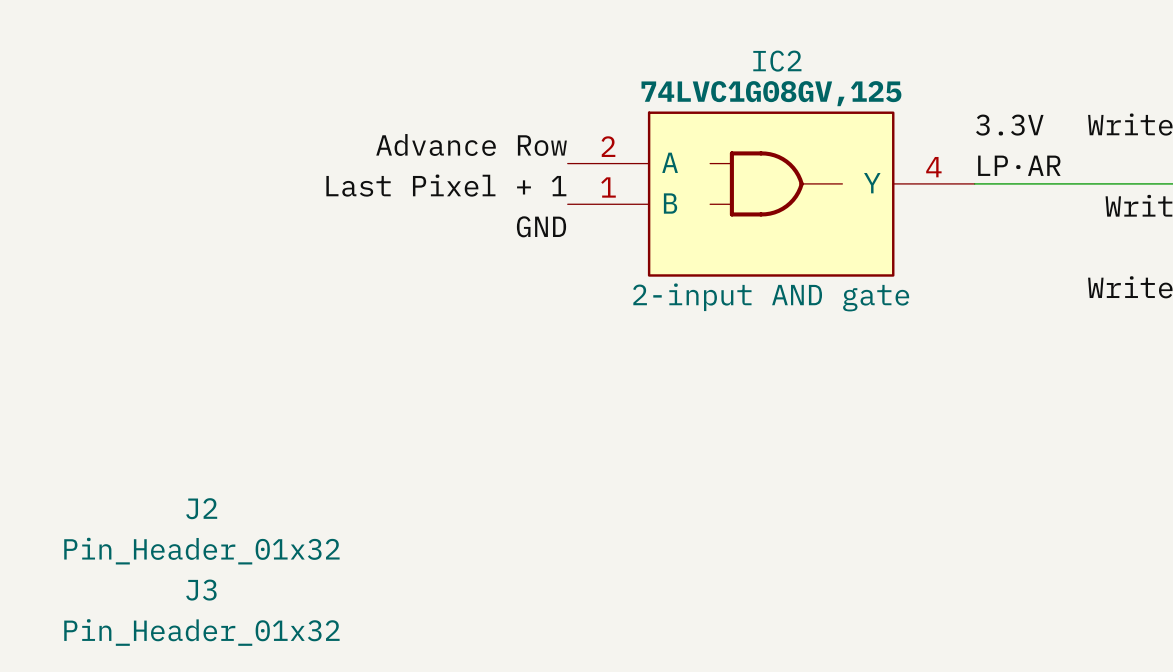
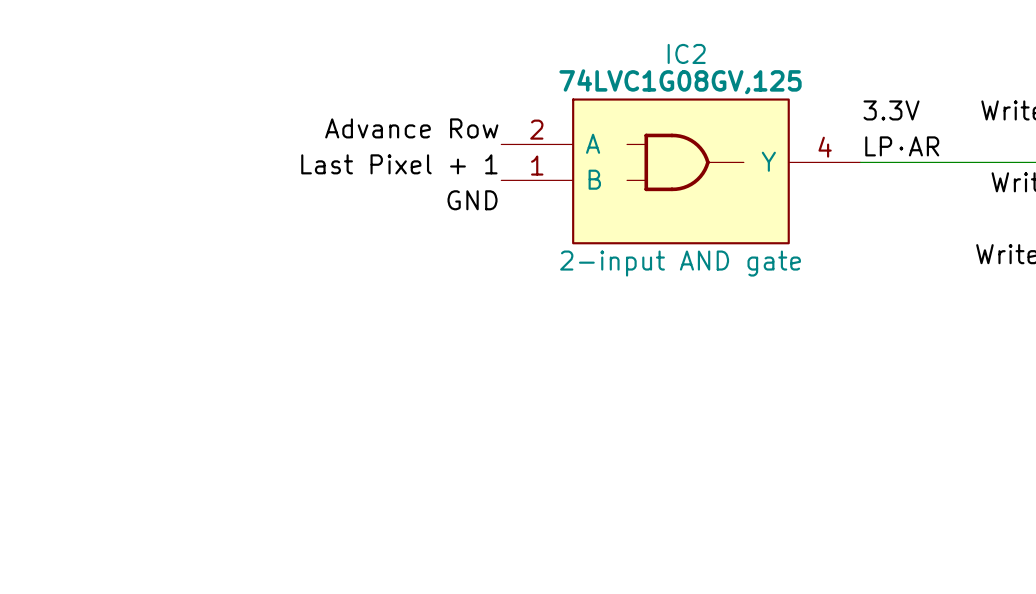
J2: Pin_Header_01x32 (201, 531) -> none
J3: Pin_Header_01x32 (201, 612) -> none

